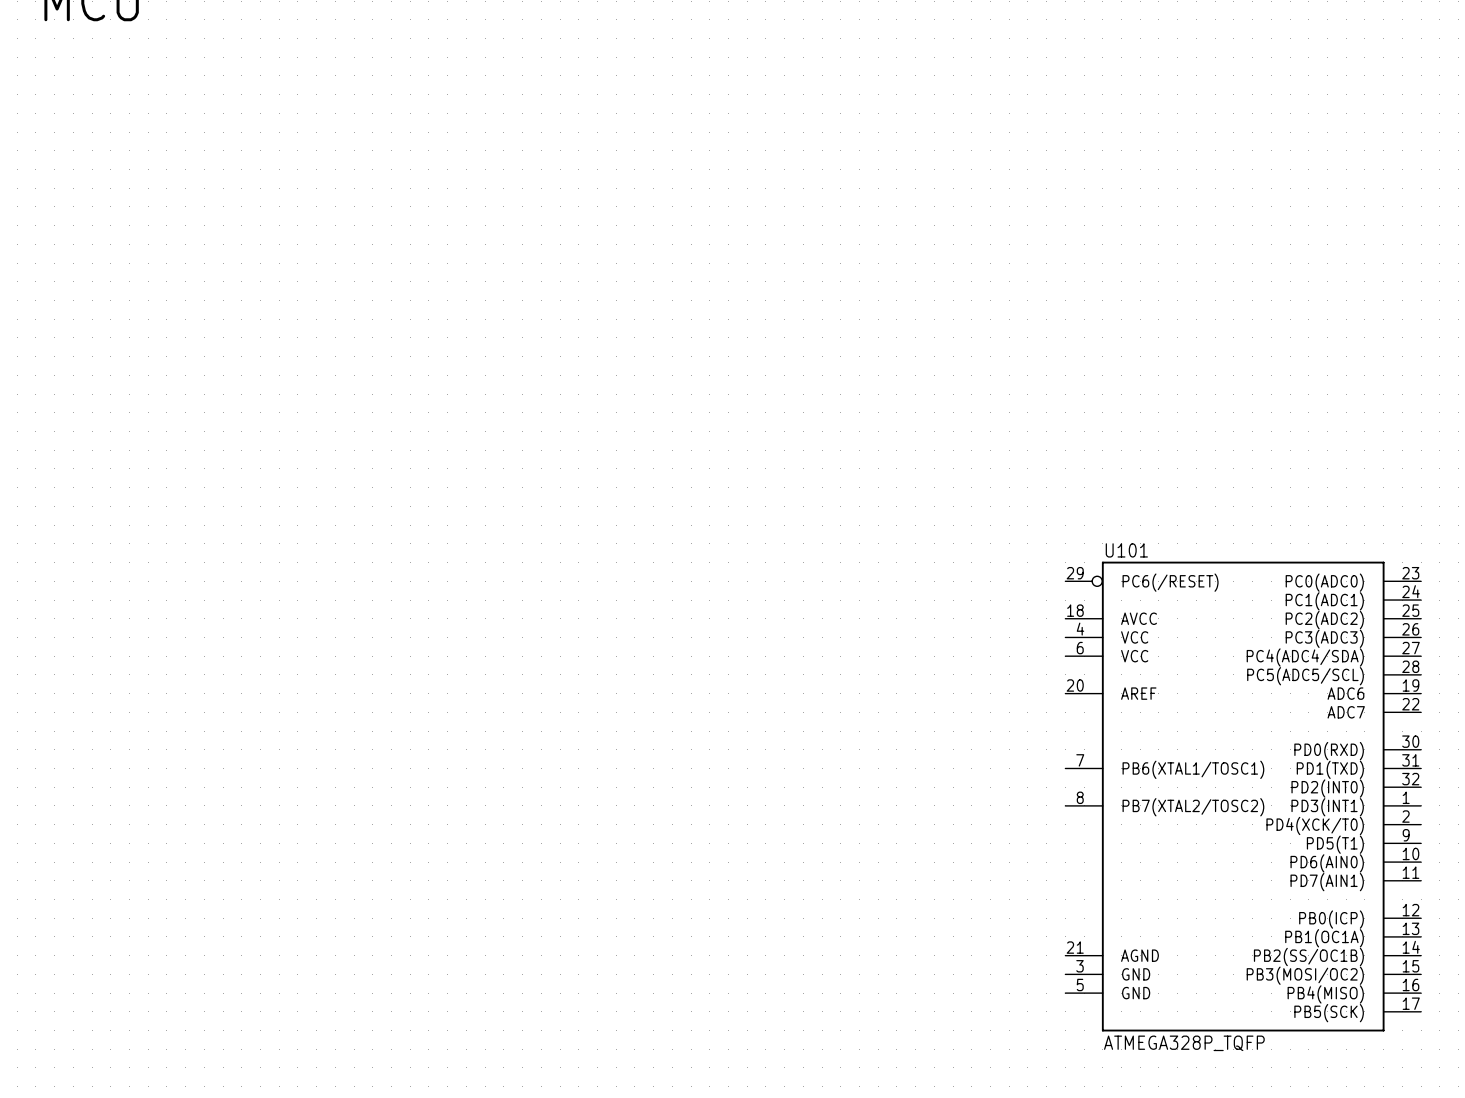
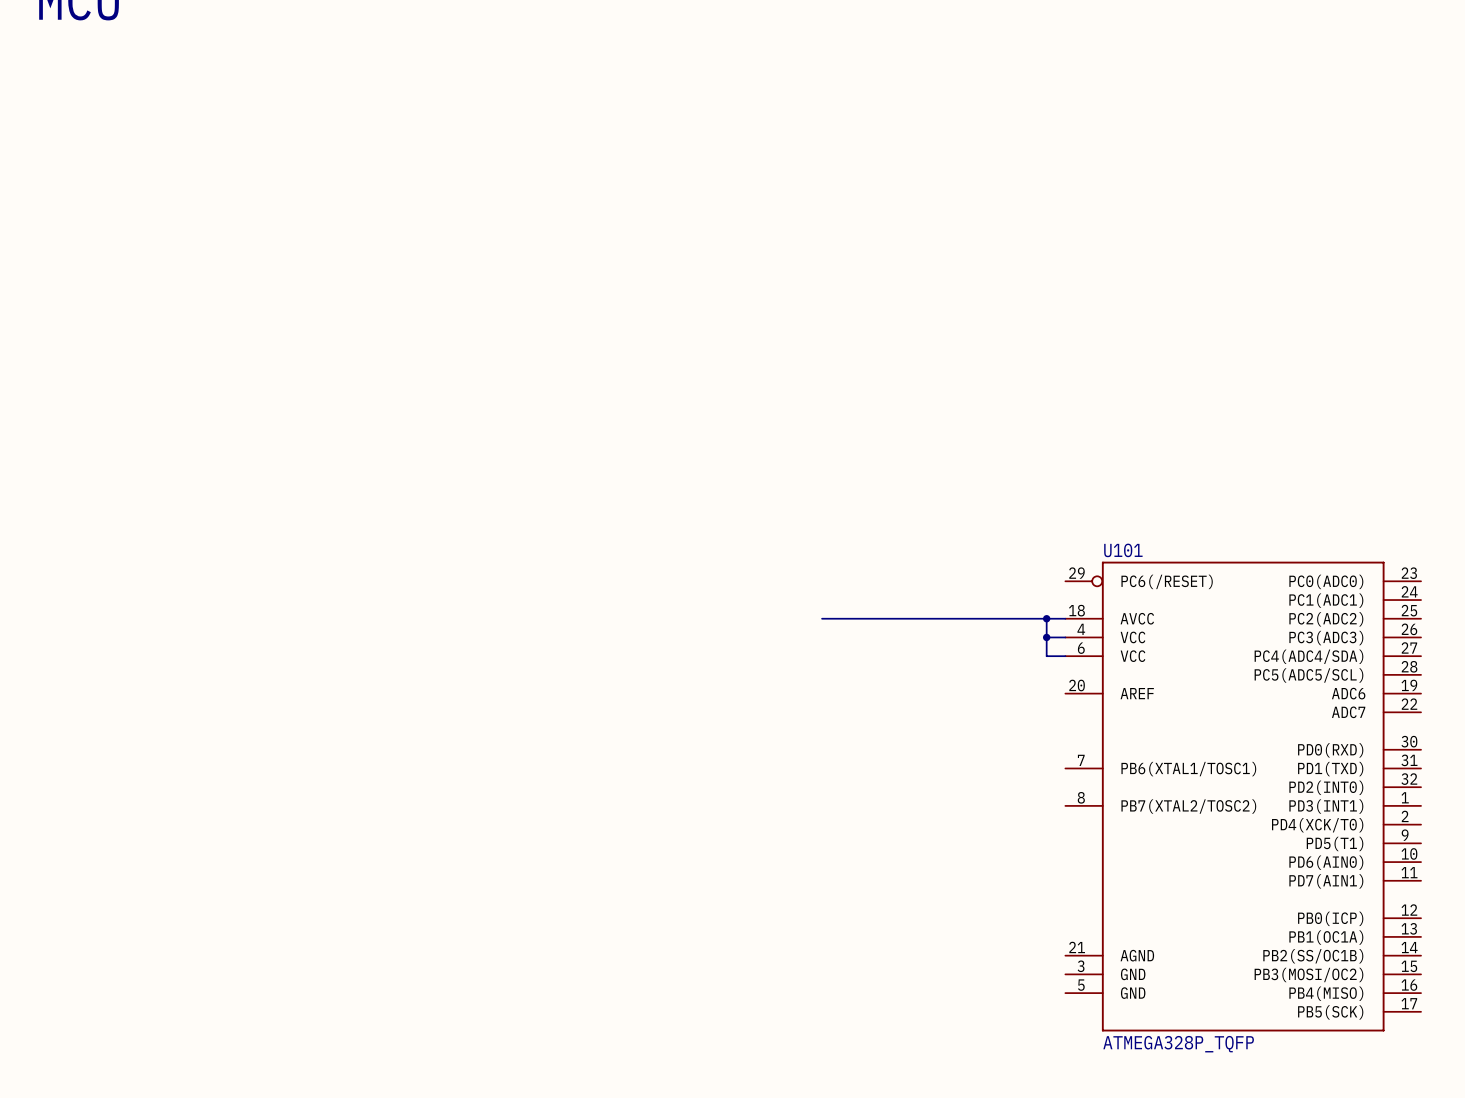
wire: none -> (822, 618) (1065, 618)
wire: none -> (1046, 618) (1046, 656) (1065, 656)
junction: none -> (1046, 618)
wire: none -> (1046, 637) (1065, 637)
junction: none -> (1046, 637)

